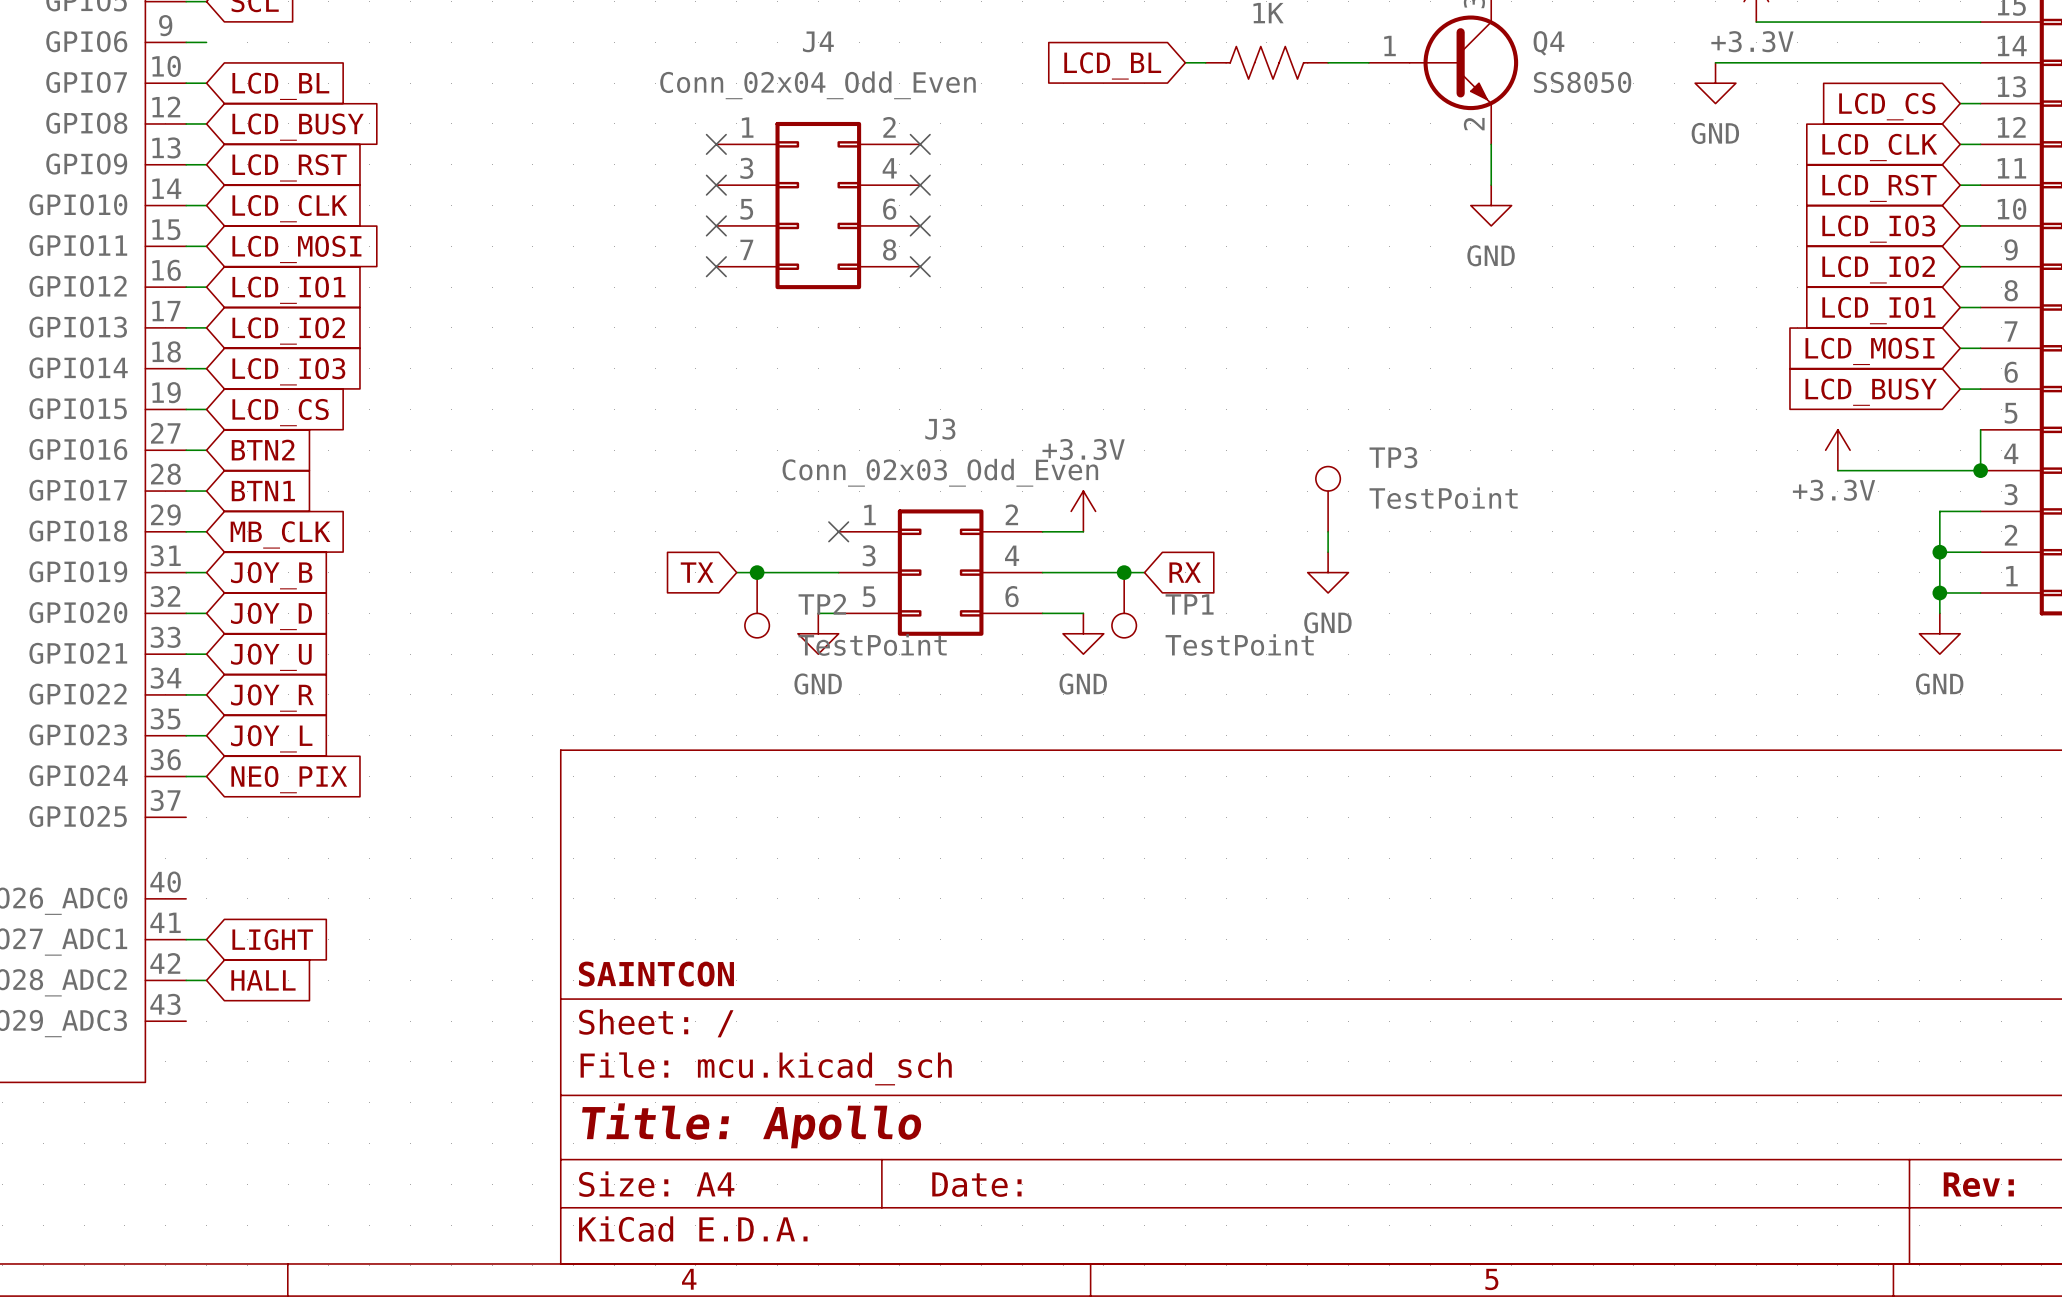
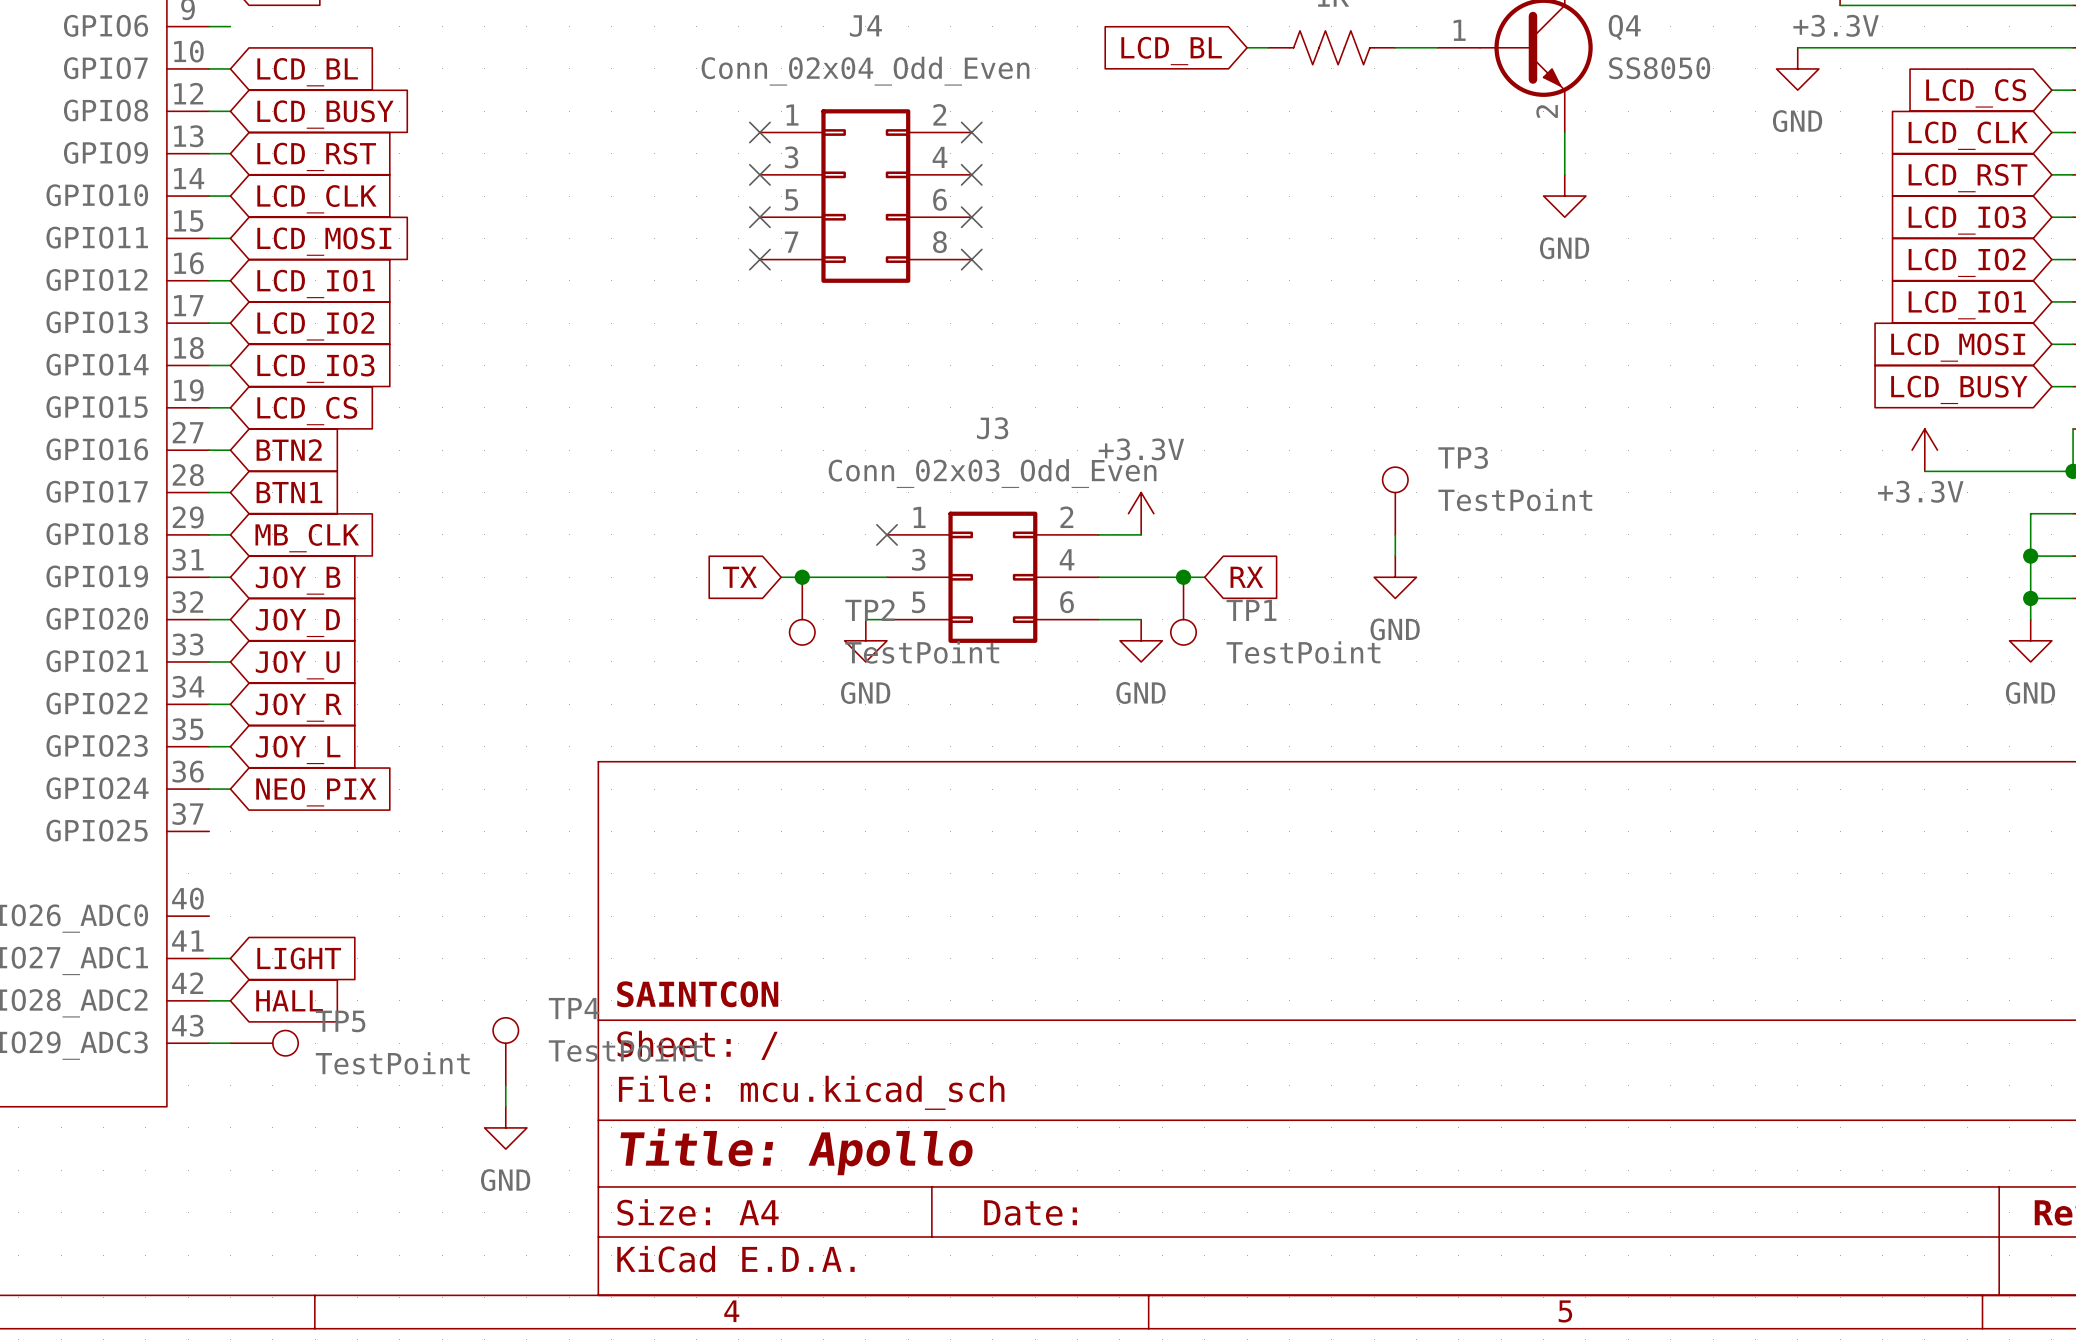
wire: none -> (209, 1043) (230, 1043)
TP5: none -> TestPoint (264, 1043)
TP4: none -> TestPoint (505, 1051)
wire: none -> (505, 1085) (505, 1106)
power symbol: none -> GND (505, 1127)

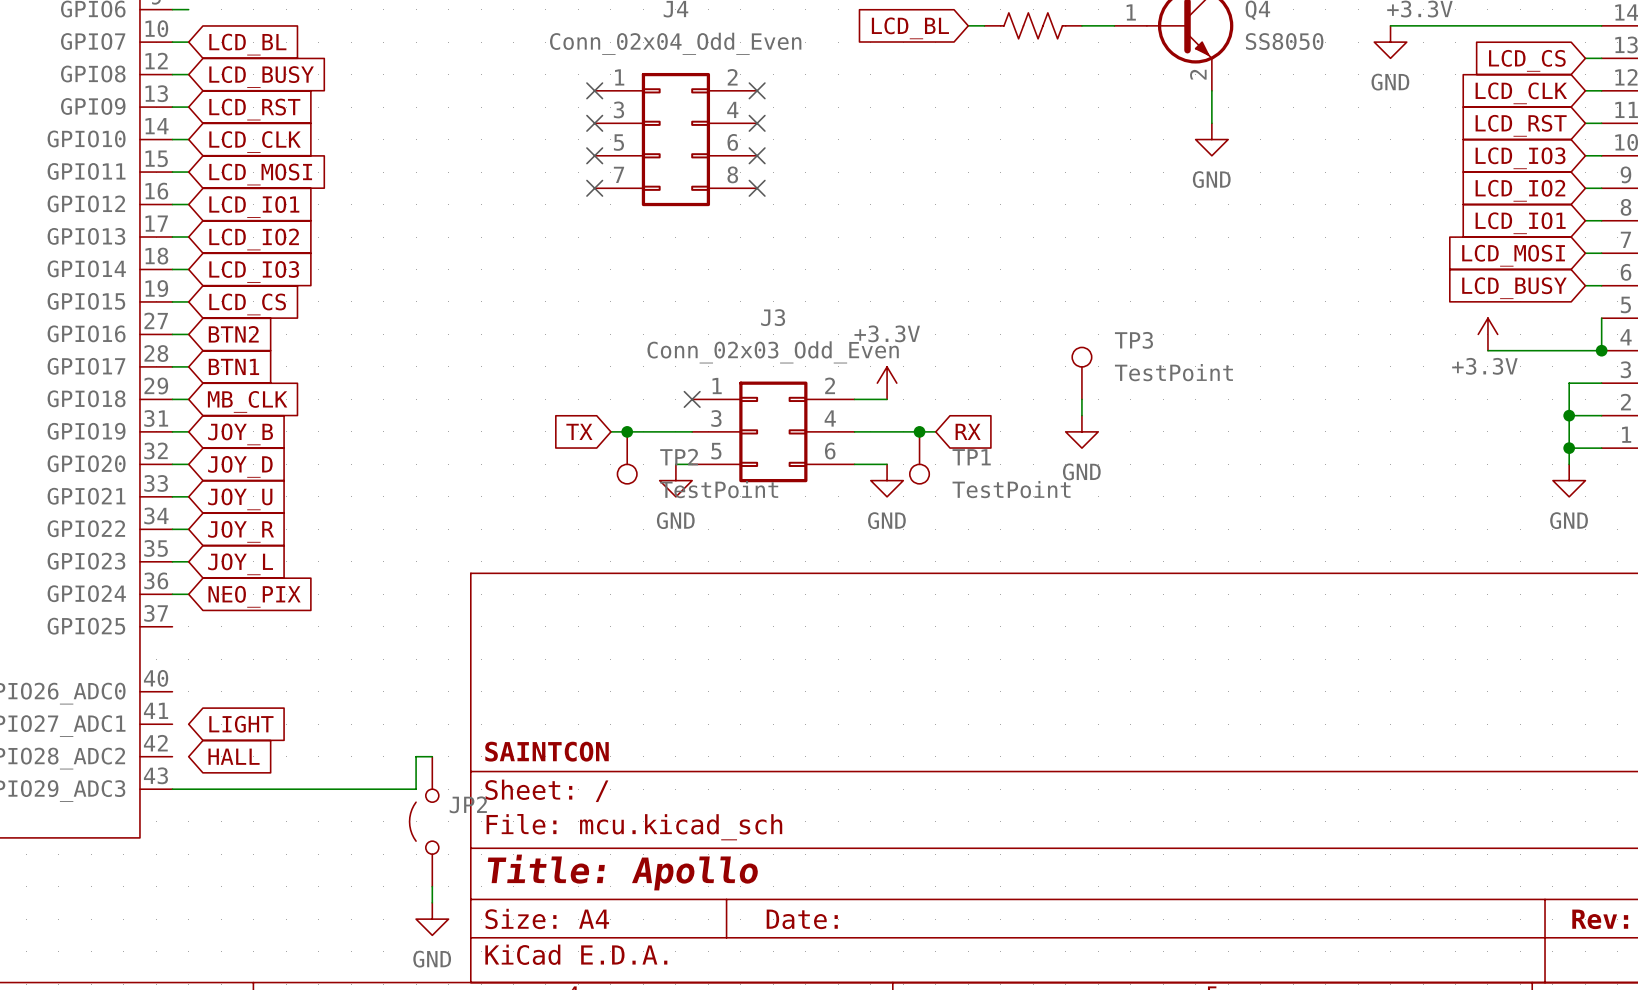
wire: (209, 958) (230, 958) -> none
wire: (209, 1000) (230, 1000) -> none
wire: none -> (432, 756) (416, 756) (416, 789) (188, 789)
TP5: TestPoint (264, 1043) -> none
TP4: TestPoint (505, 1051) -> none
wire: (505, 1085) (505, 1106) -> (432, 886) (432, 902)
JP2: none -> (424, 821)
power symbol position: GND (505, 1127) -> GND (432, 919)

